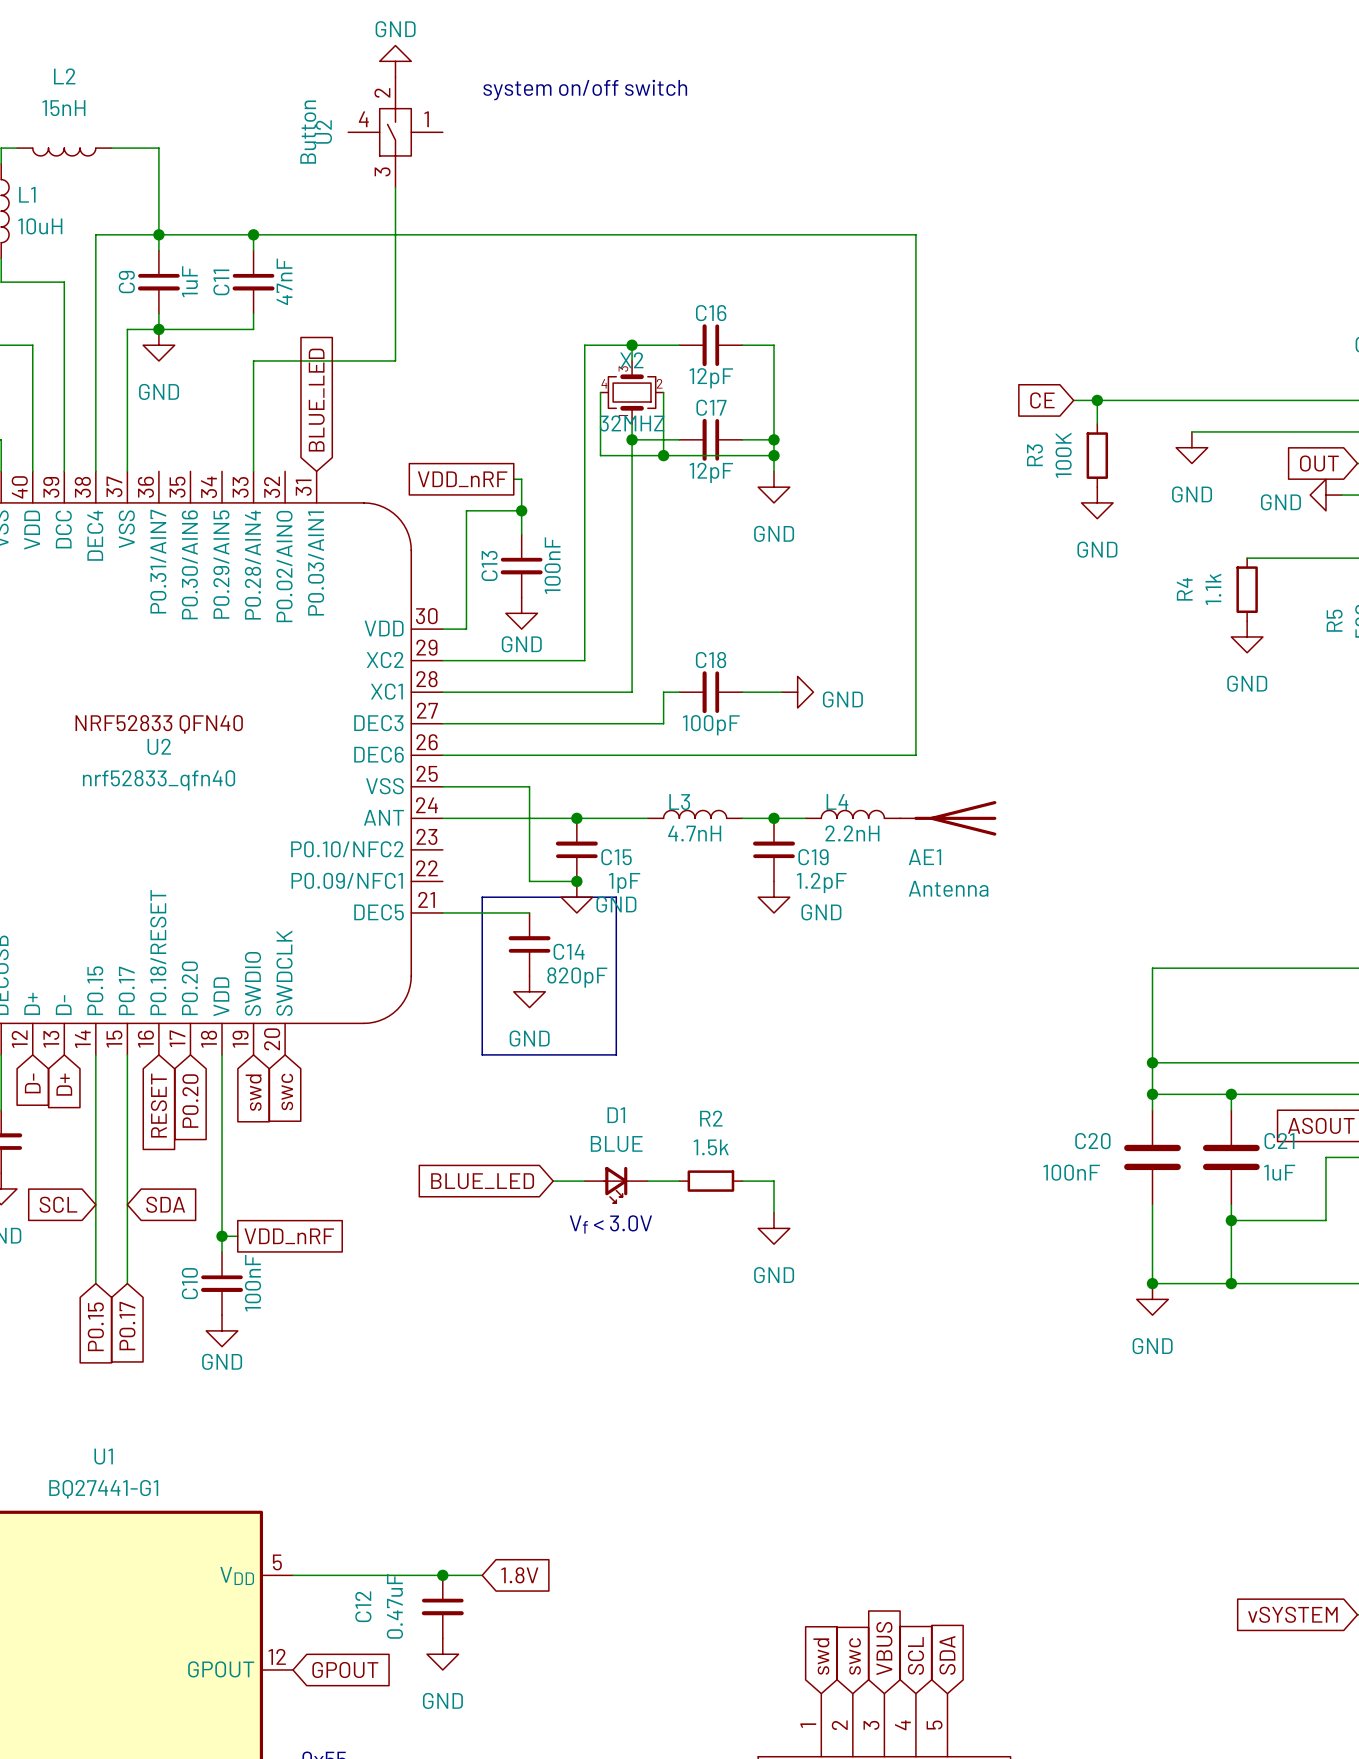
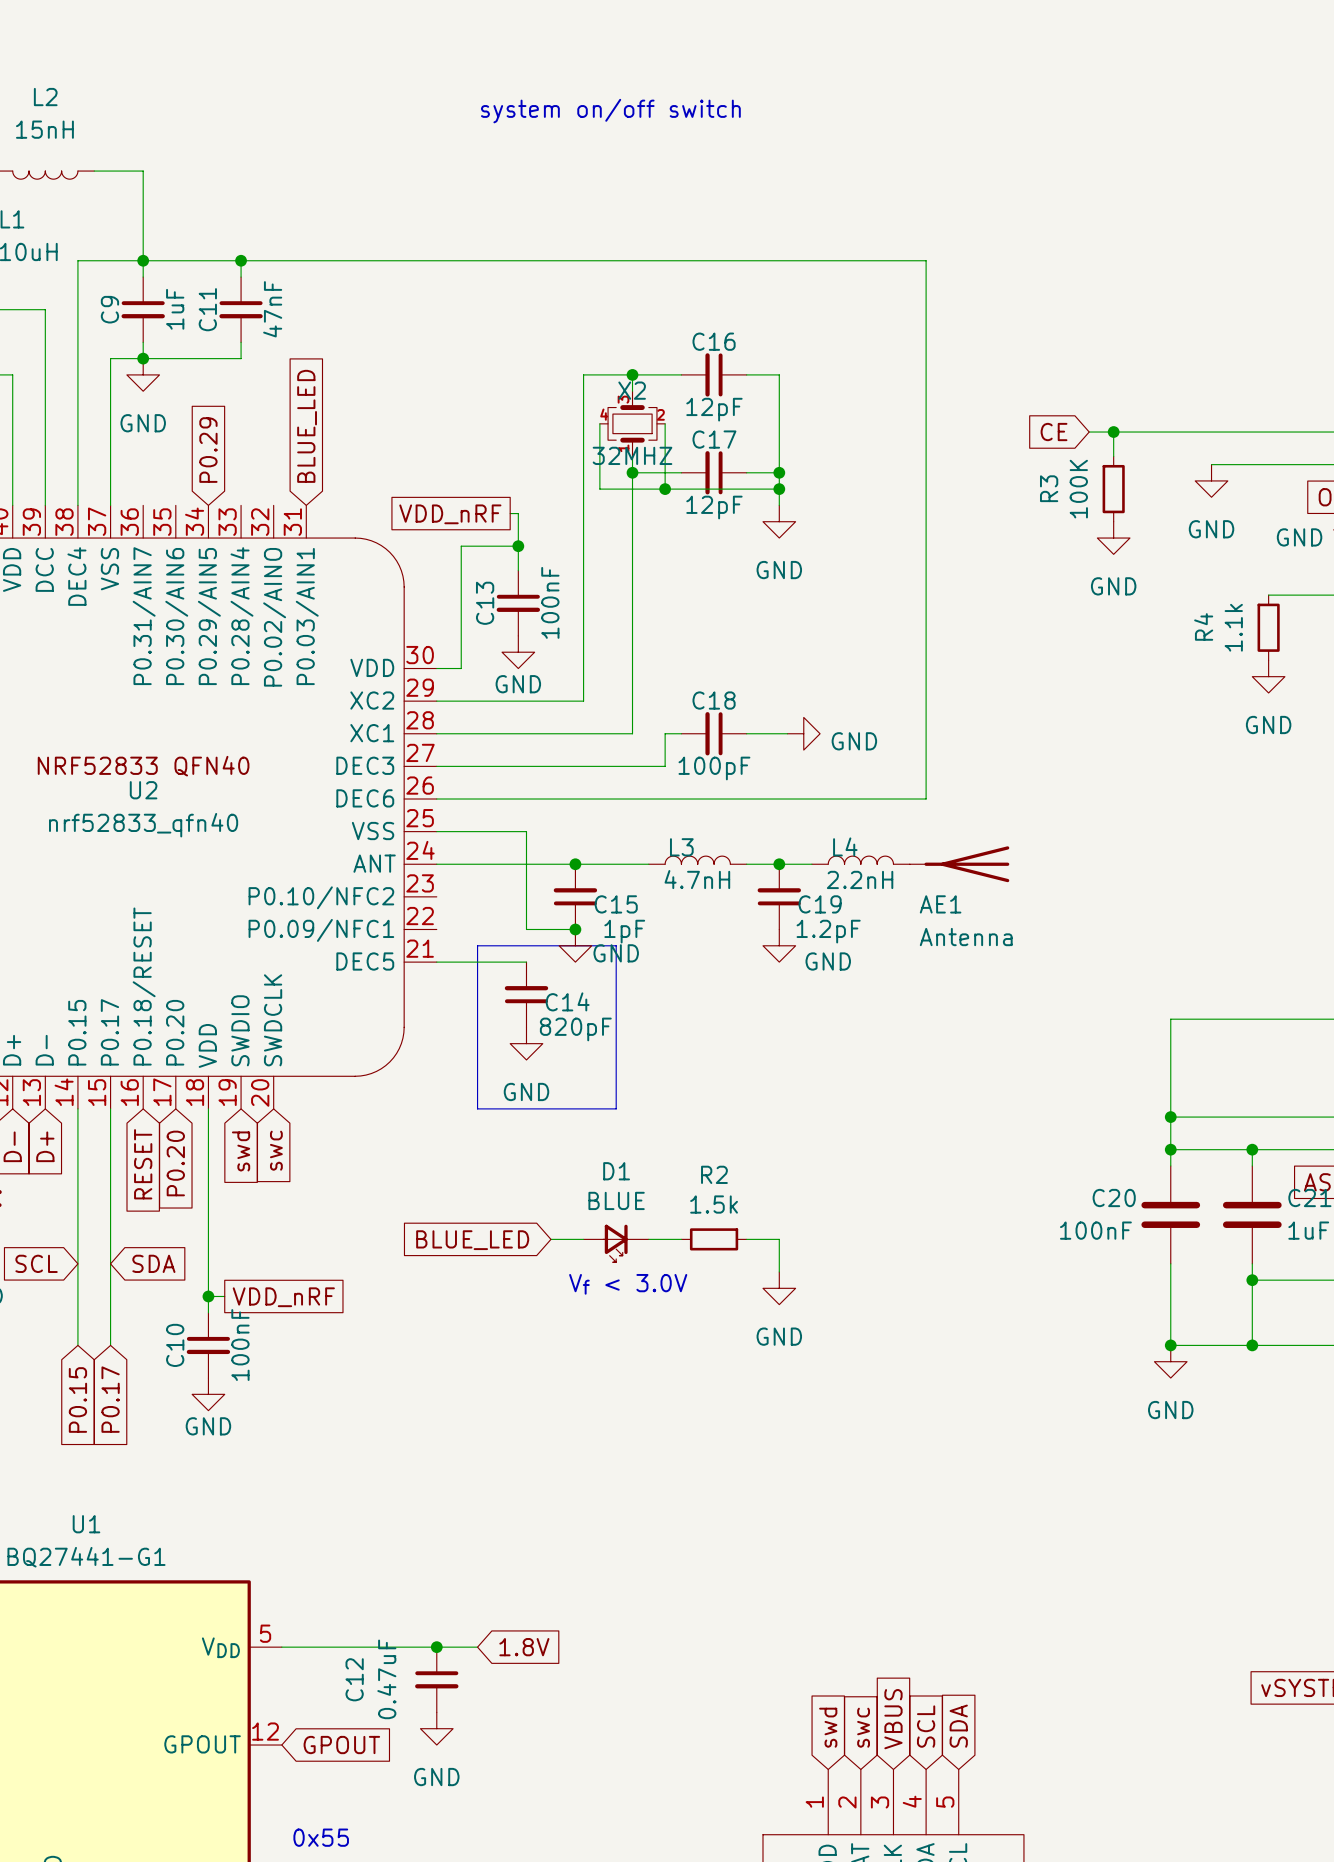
power symbol: GND (395, 61) -> none
U2: Button (395, 132) -> none
wire: (395, 187) (395, 360) (253, 360) (253, 471) -> none
global label: none -> P0.29 (208, 450)

